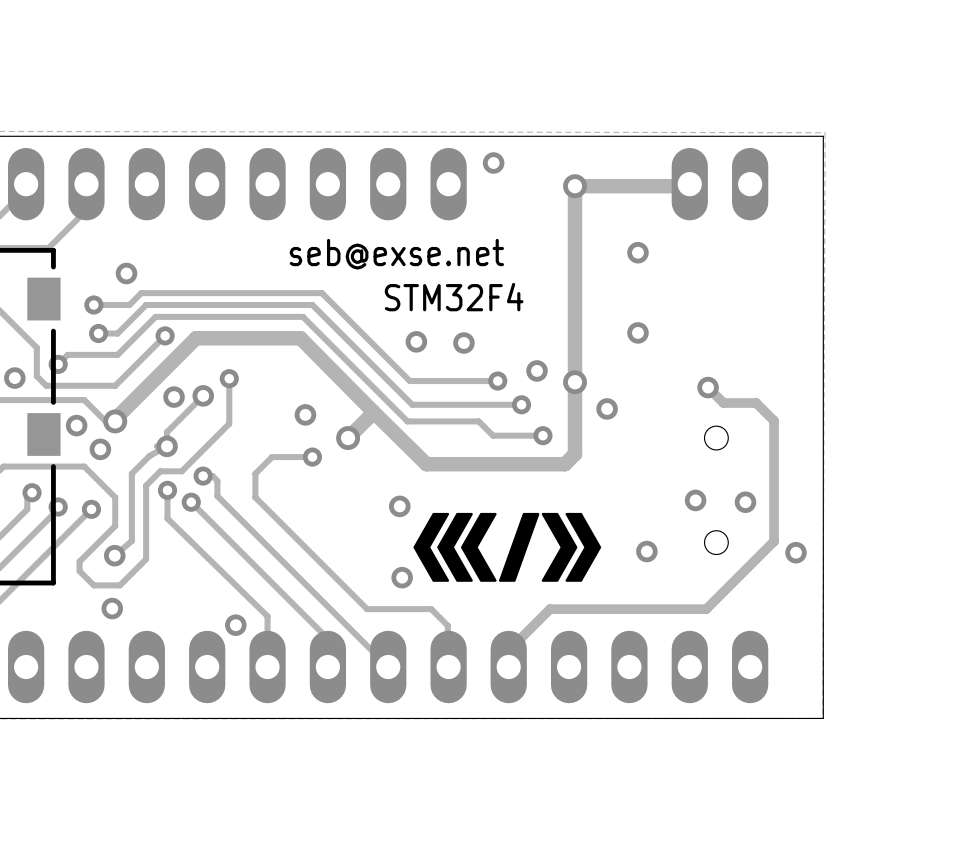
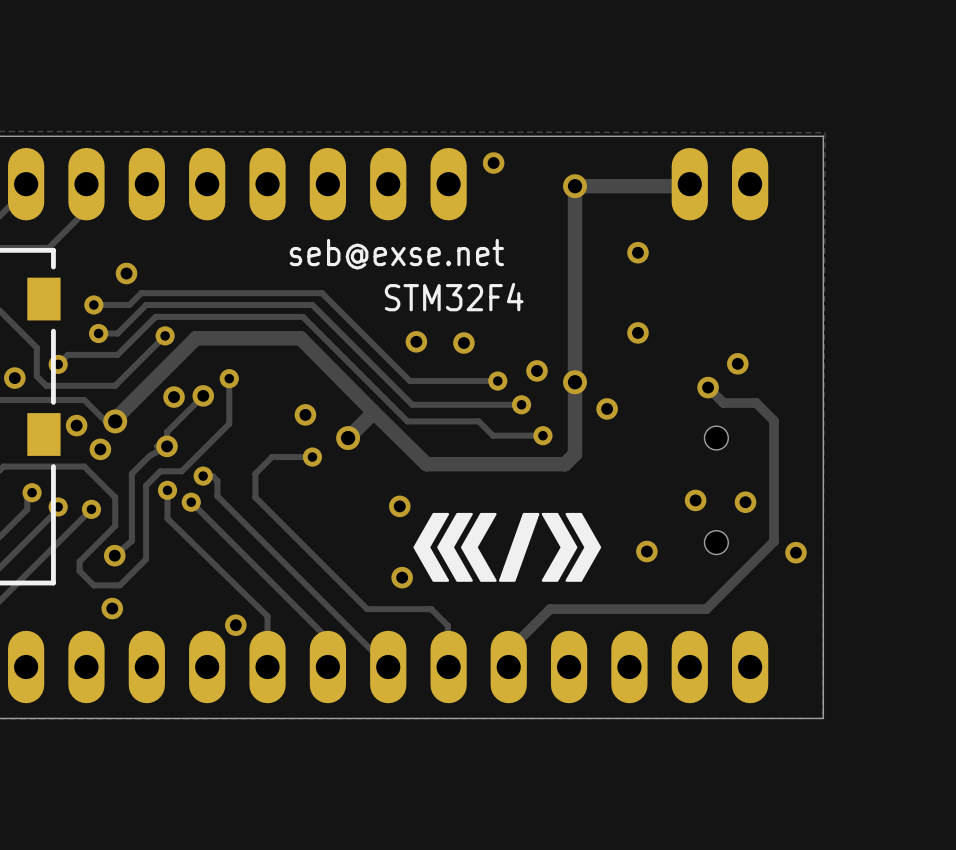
via: none -> (737, 363)

